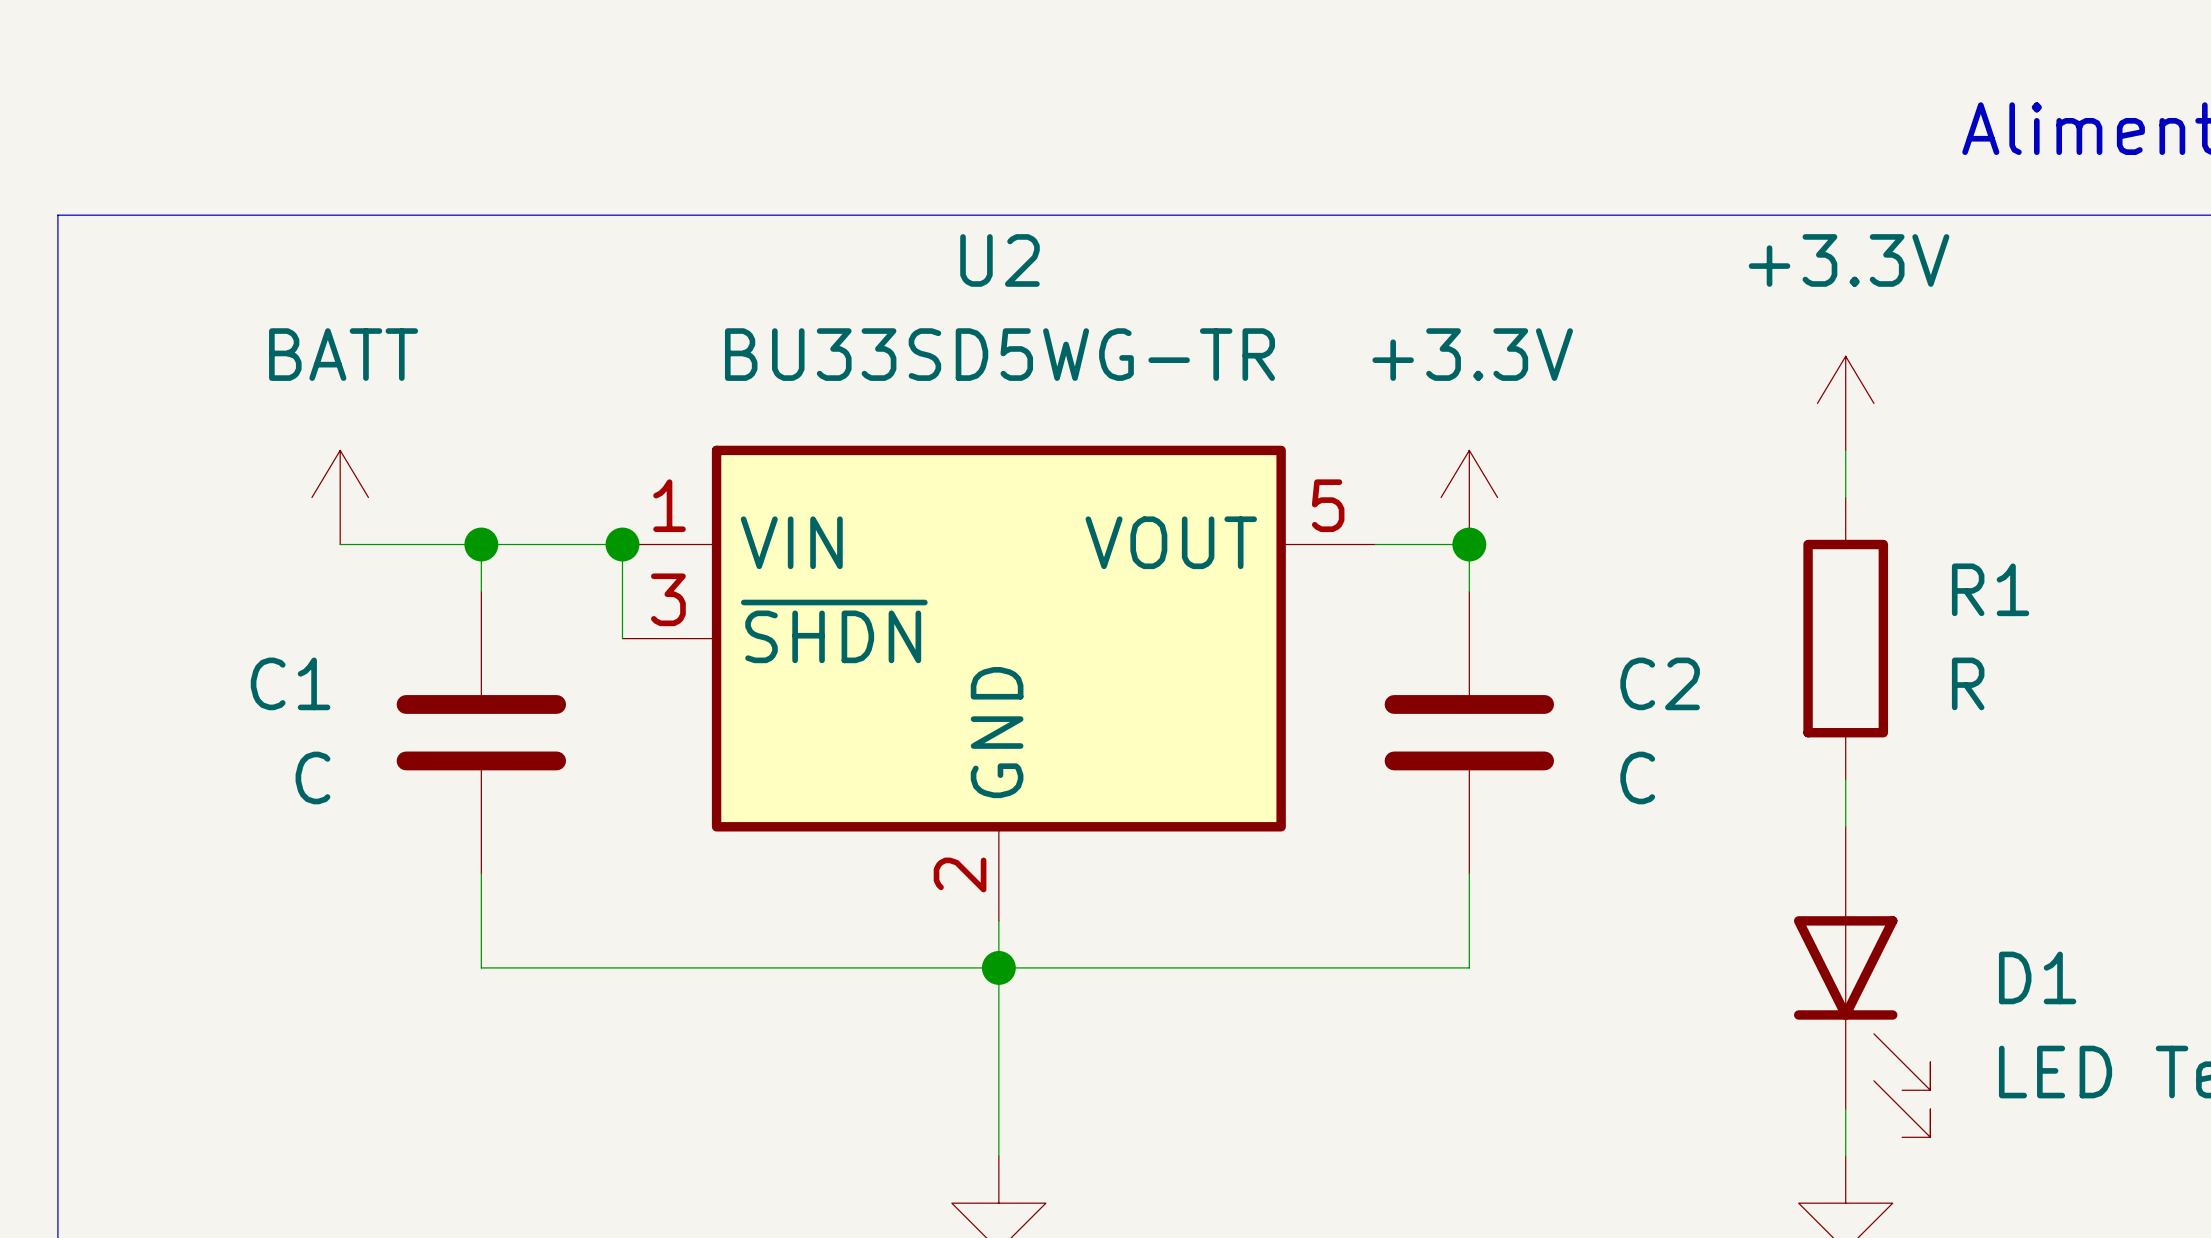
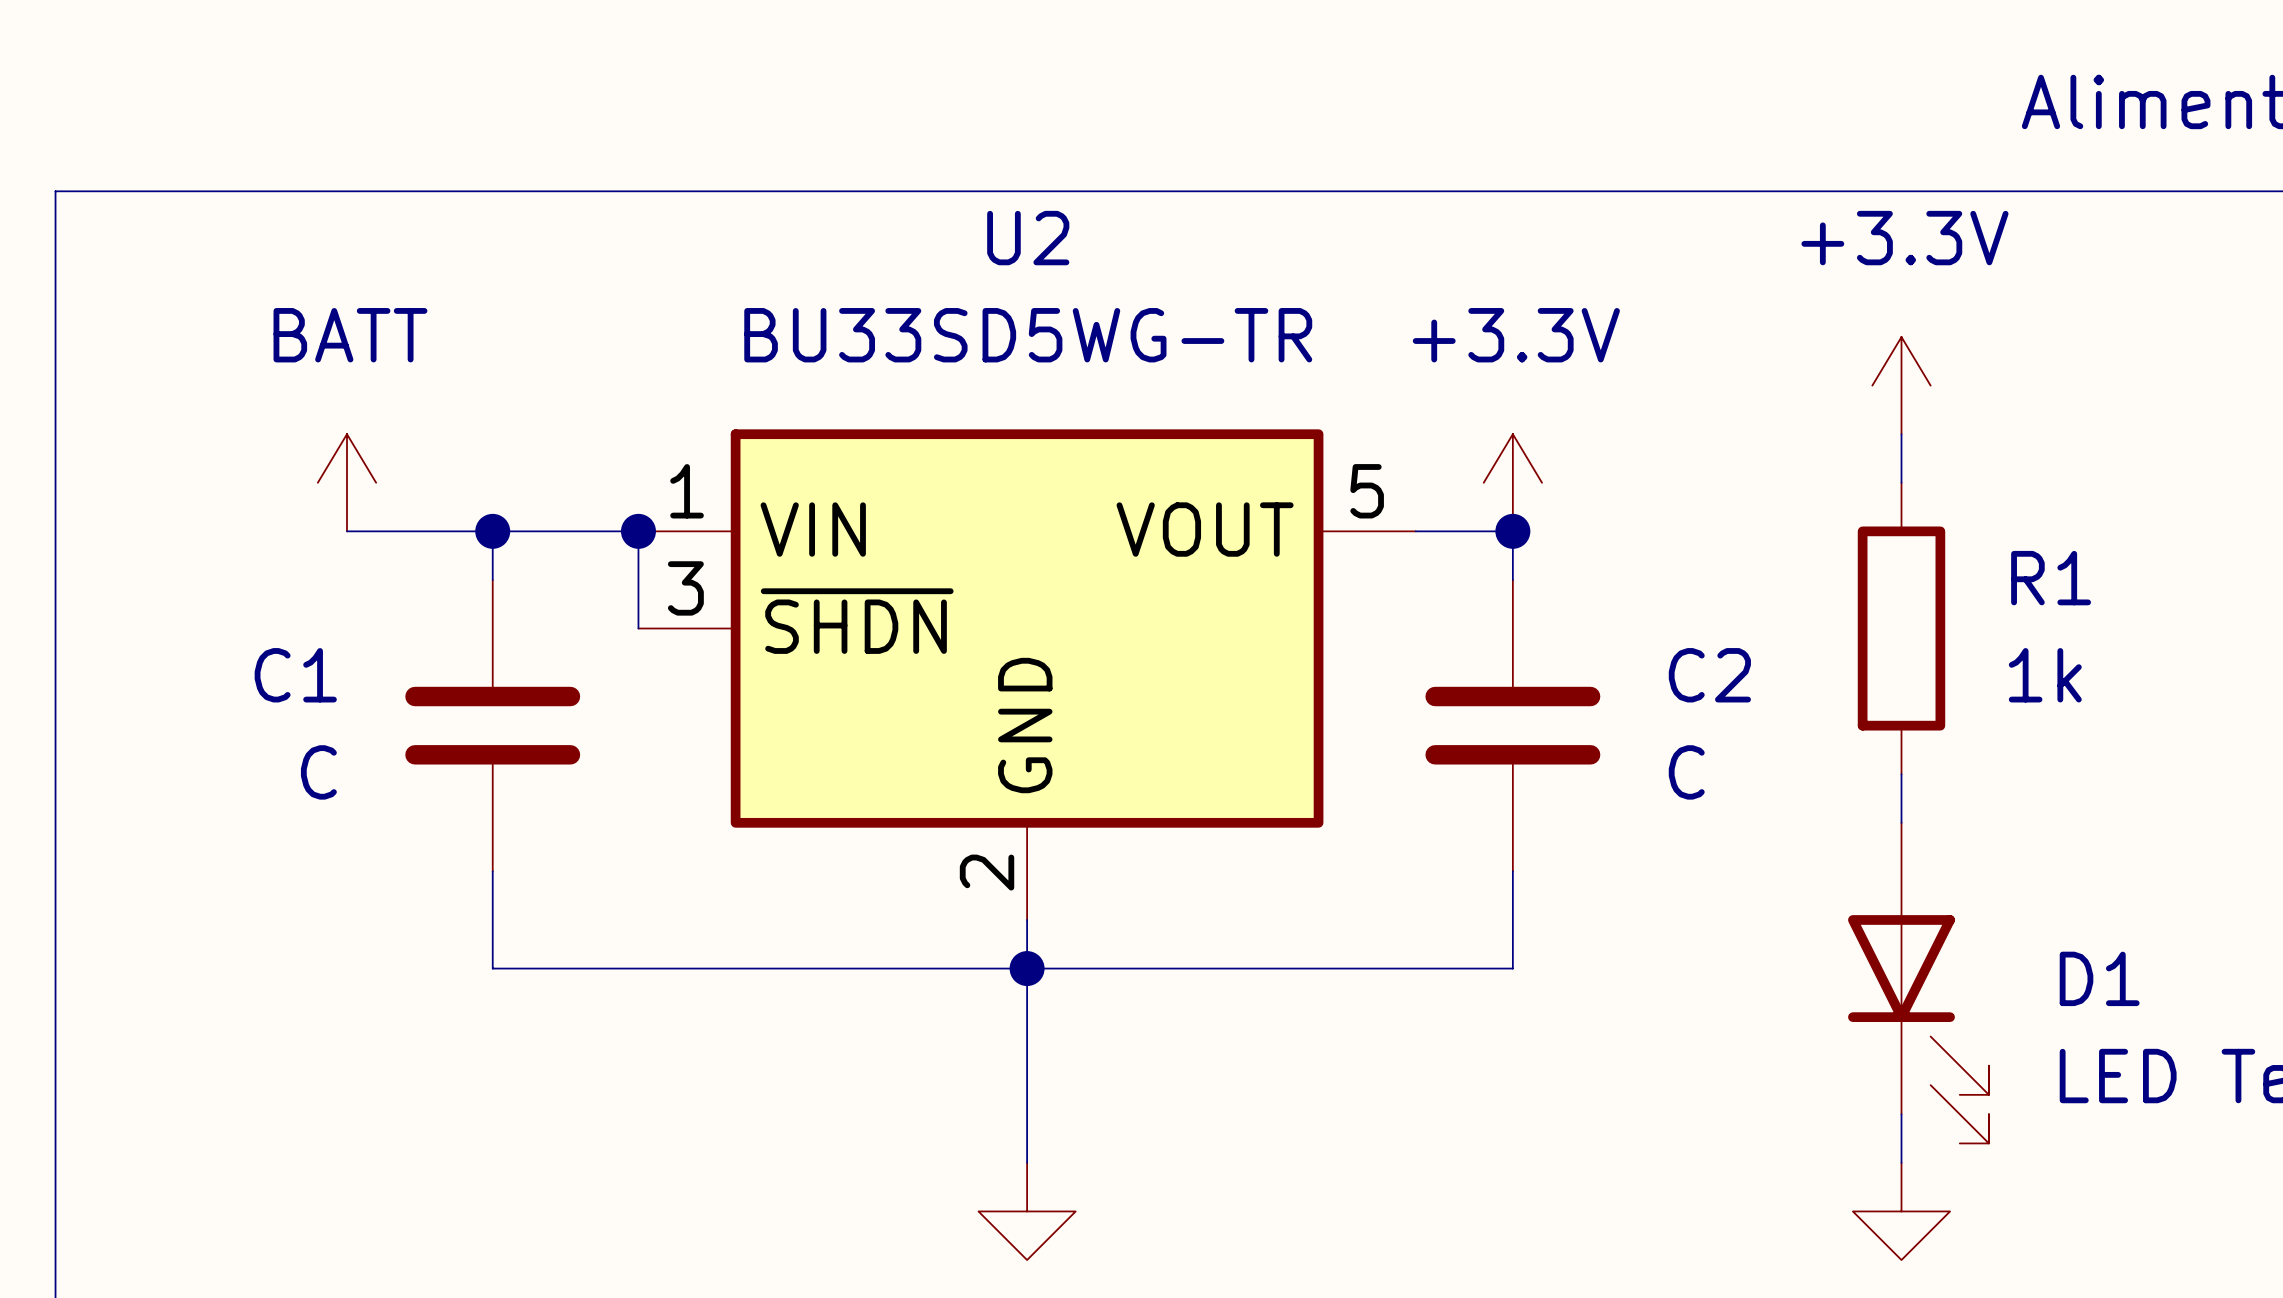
R1 value: R (1968, 683) -> 1k (2045, 675)

